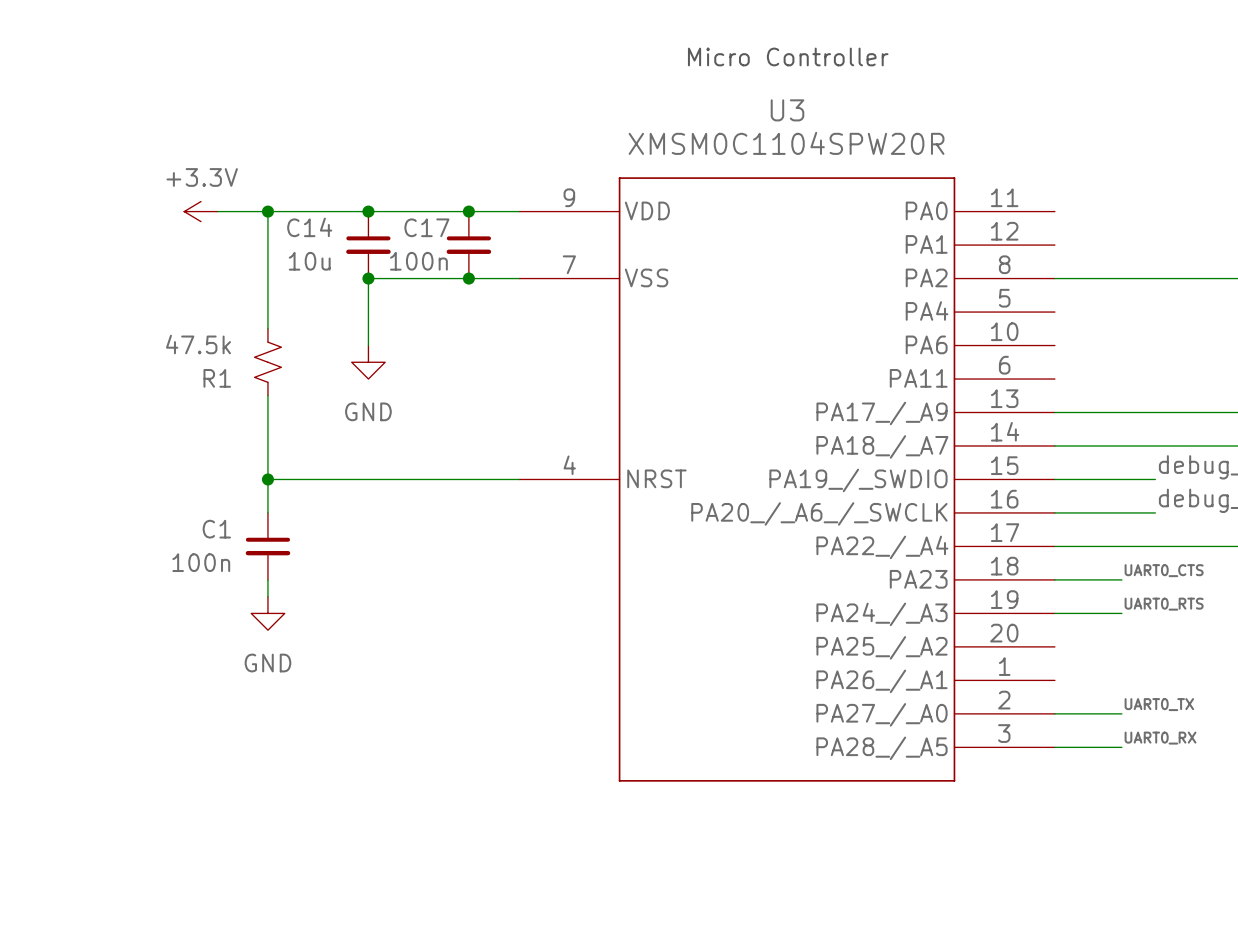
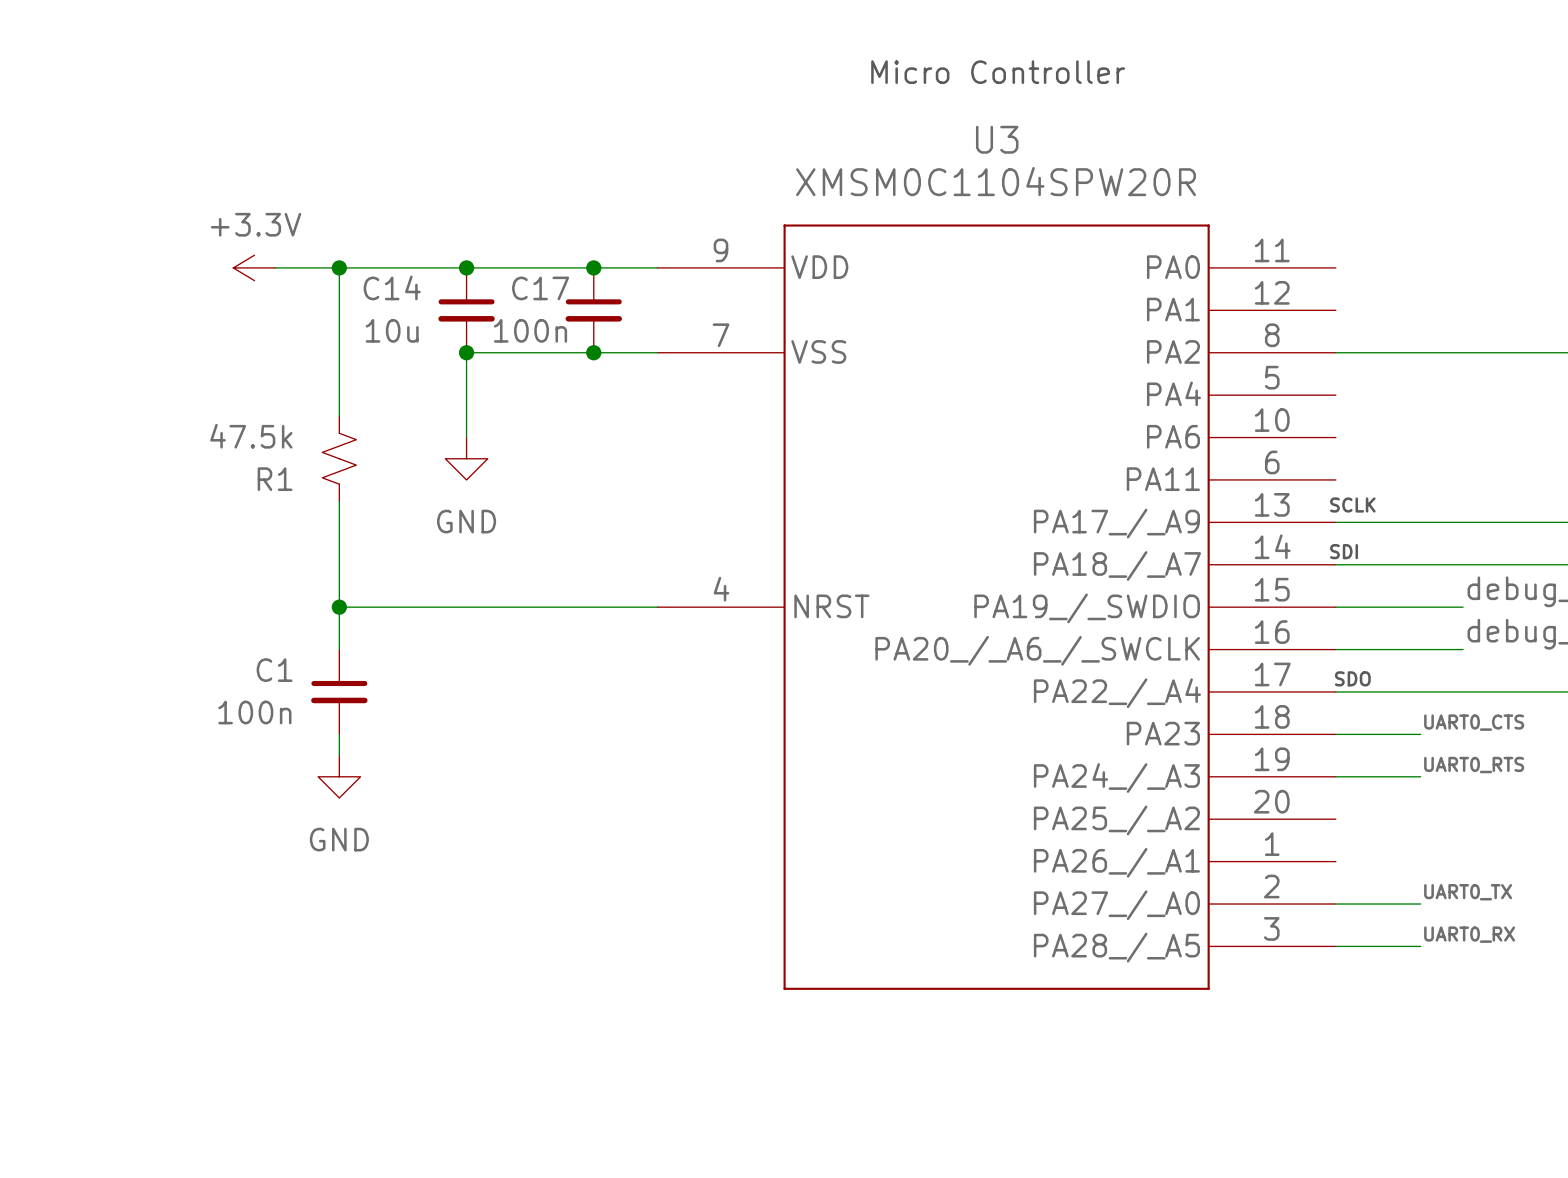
text: none -> SCLK (1352, 504)
text: none -> SDI (1344, 551)
text: none -> SDO (1352, 678)

